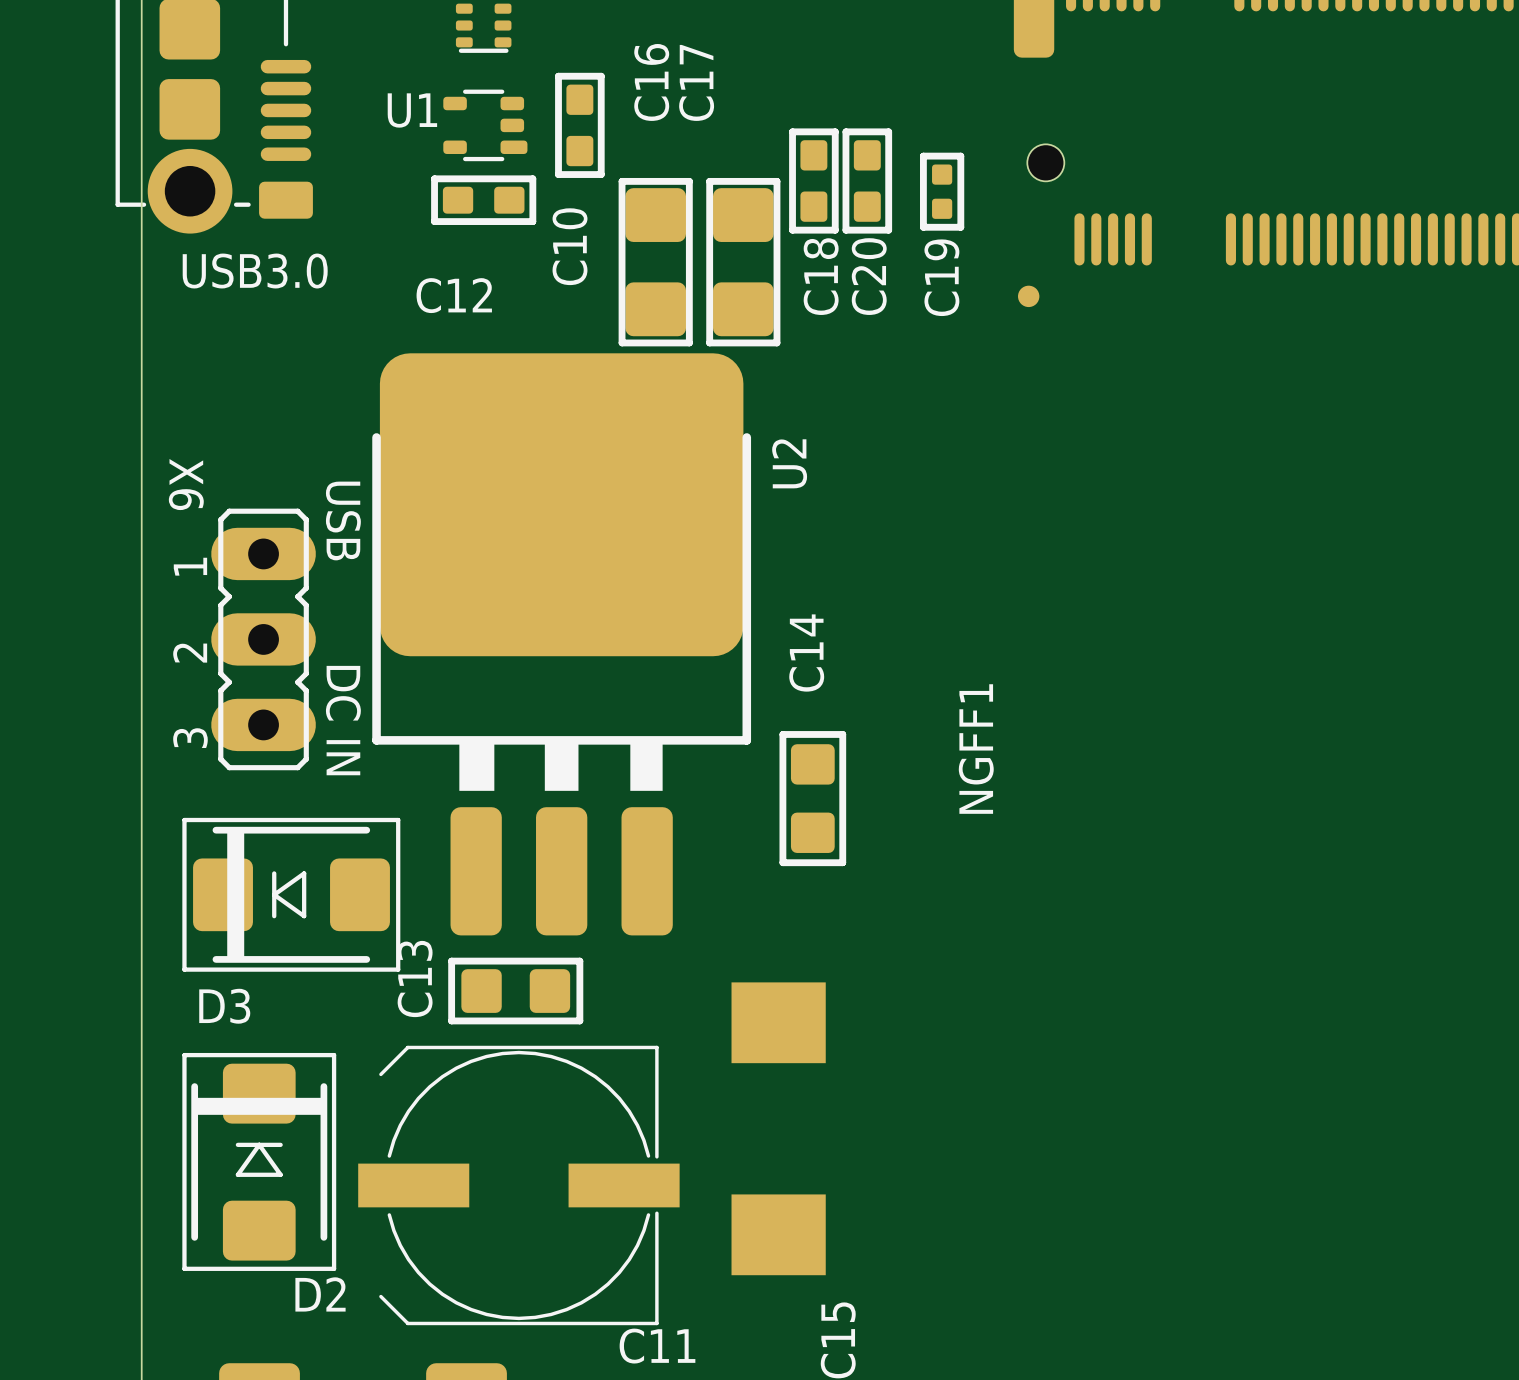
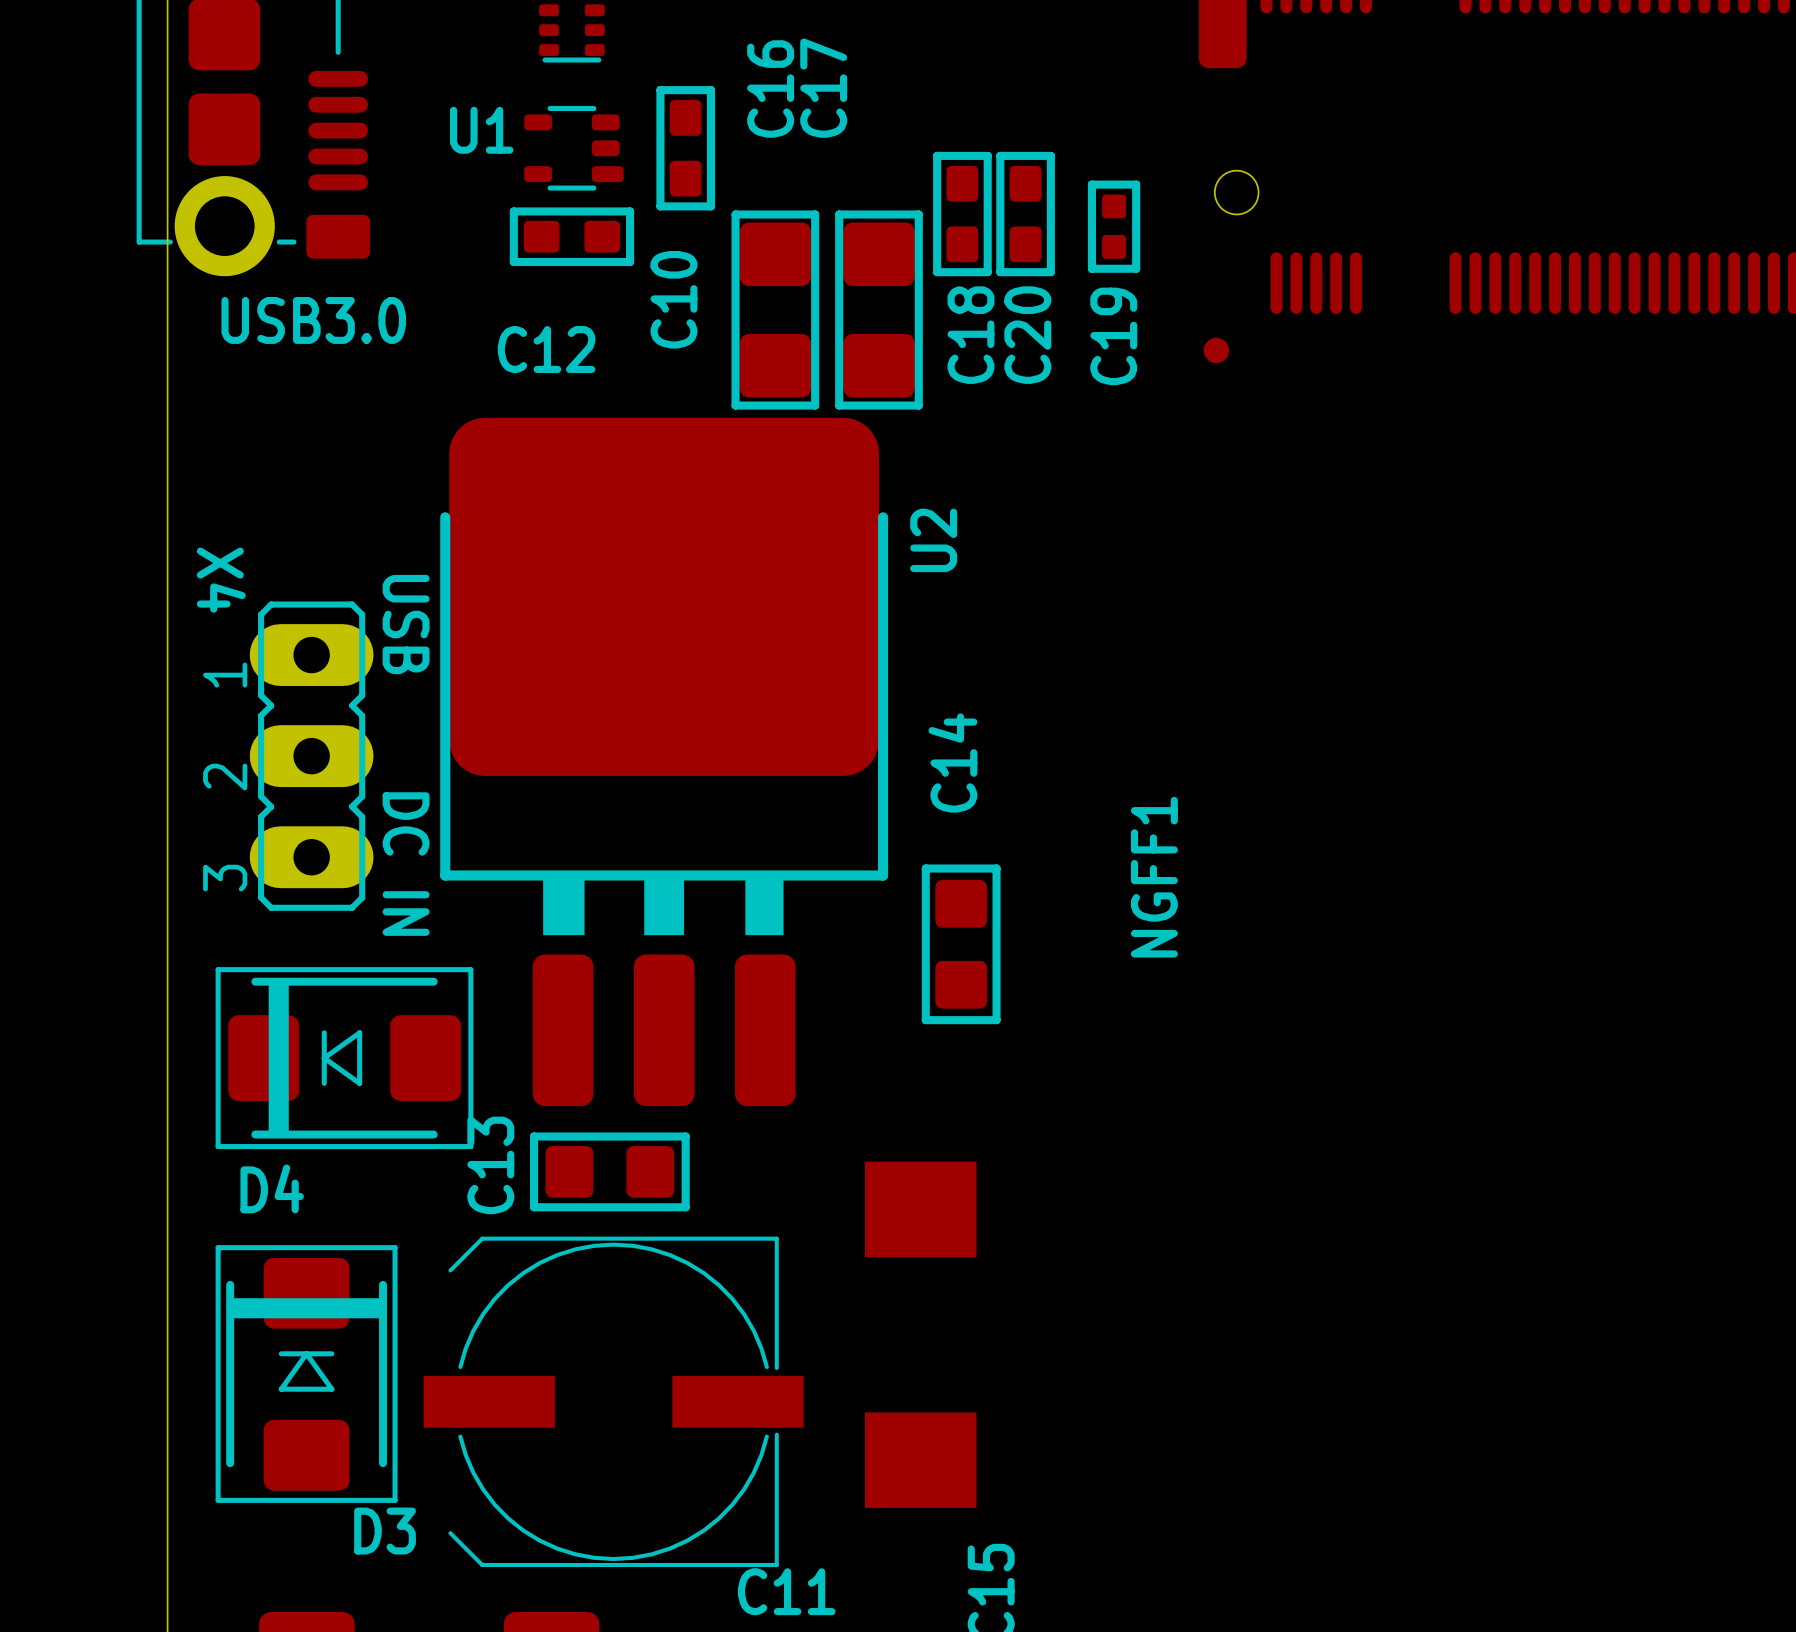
X6 name: X6 (186, 484) -> X4 (221, 580)
D3 name: D3 (224, 1006) -> D4 (272, 1188)
D2 name: D2 (320, 1294) -> D3 (385, 1531)

